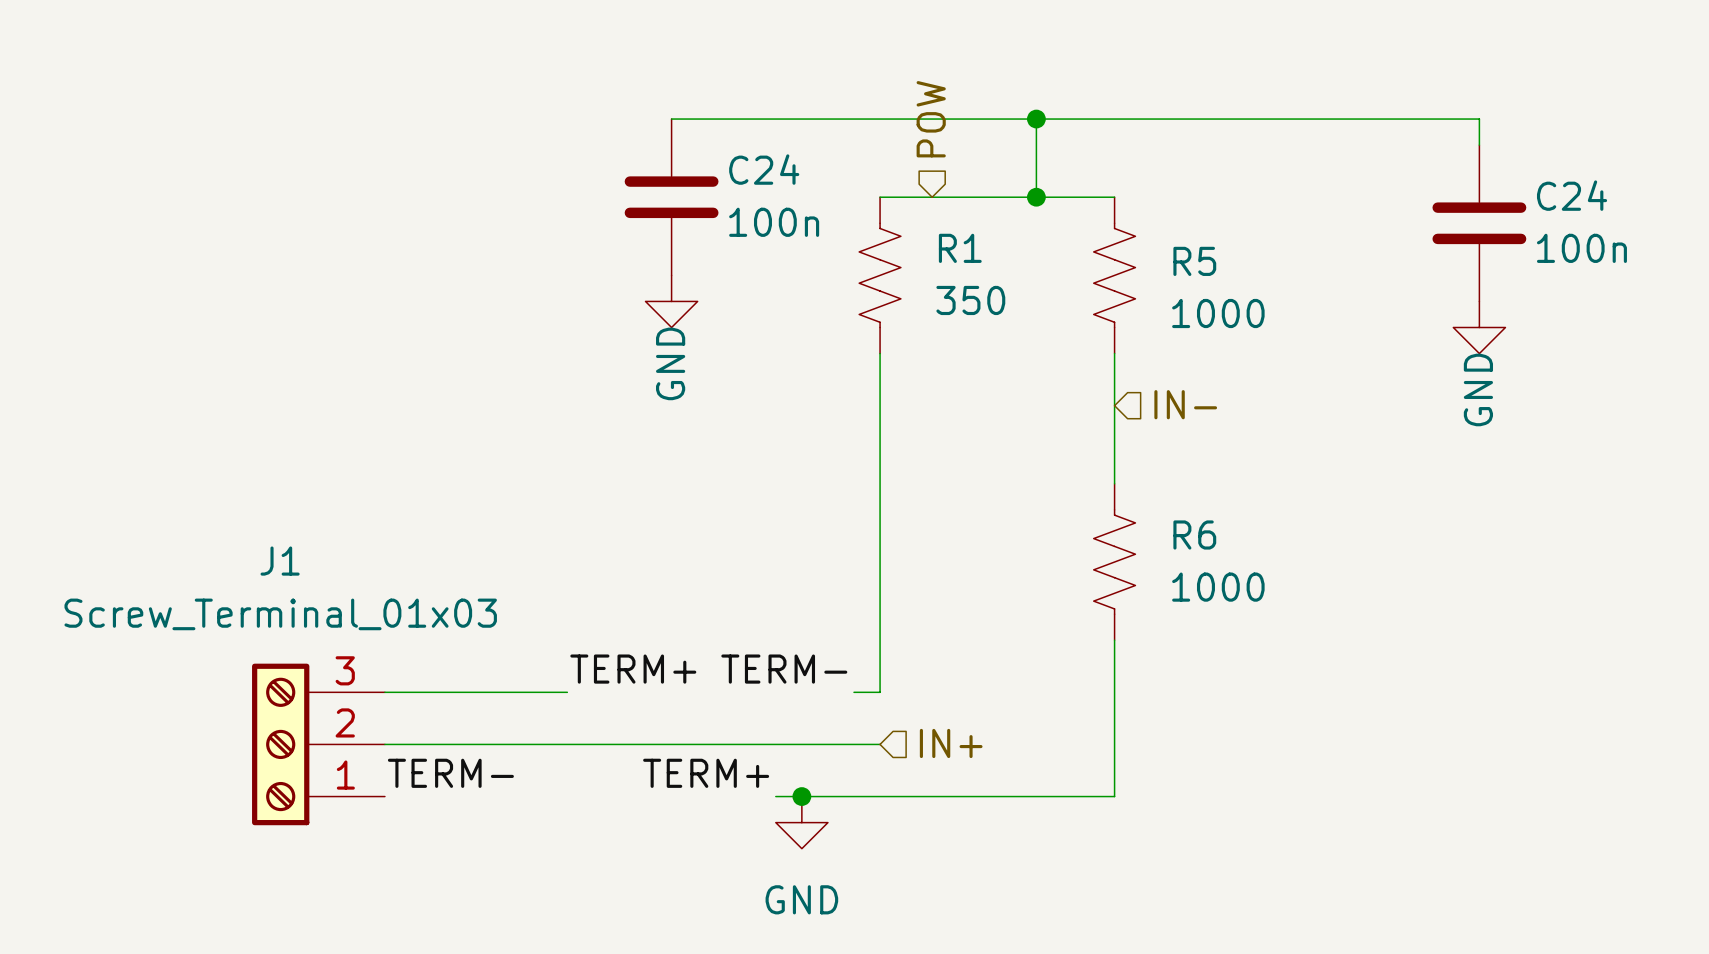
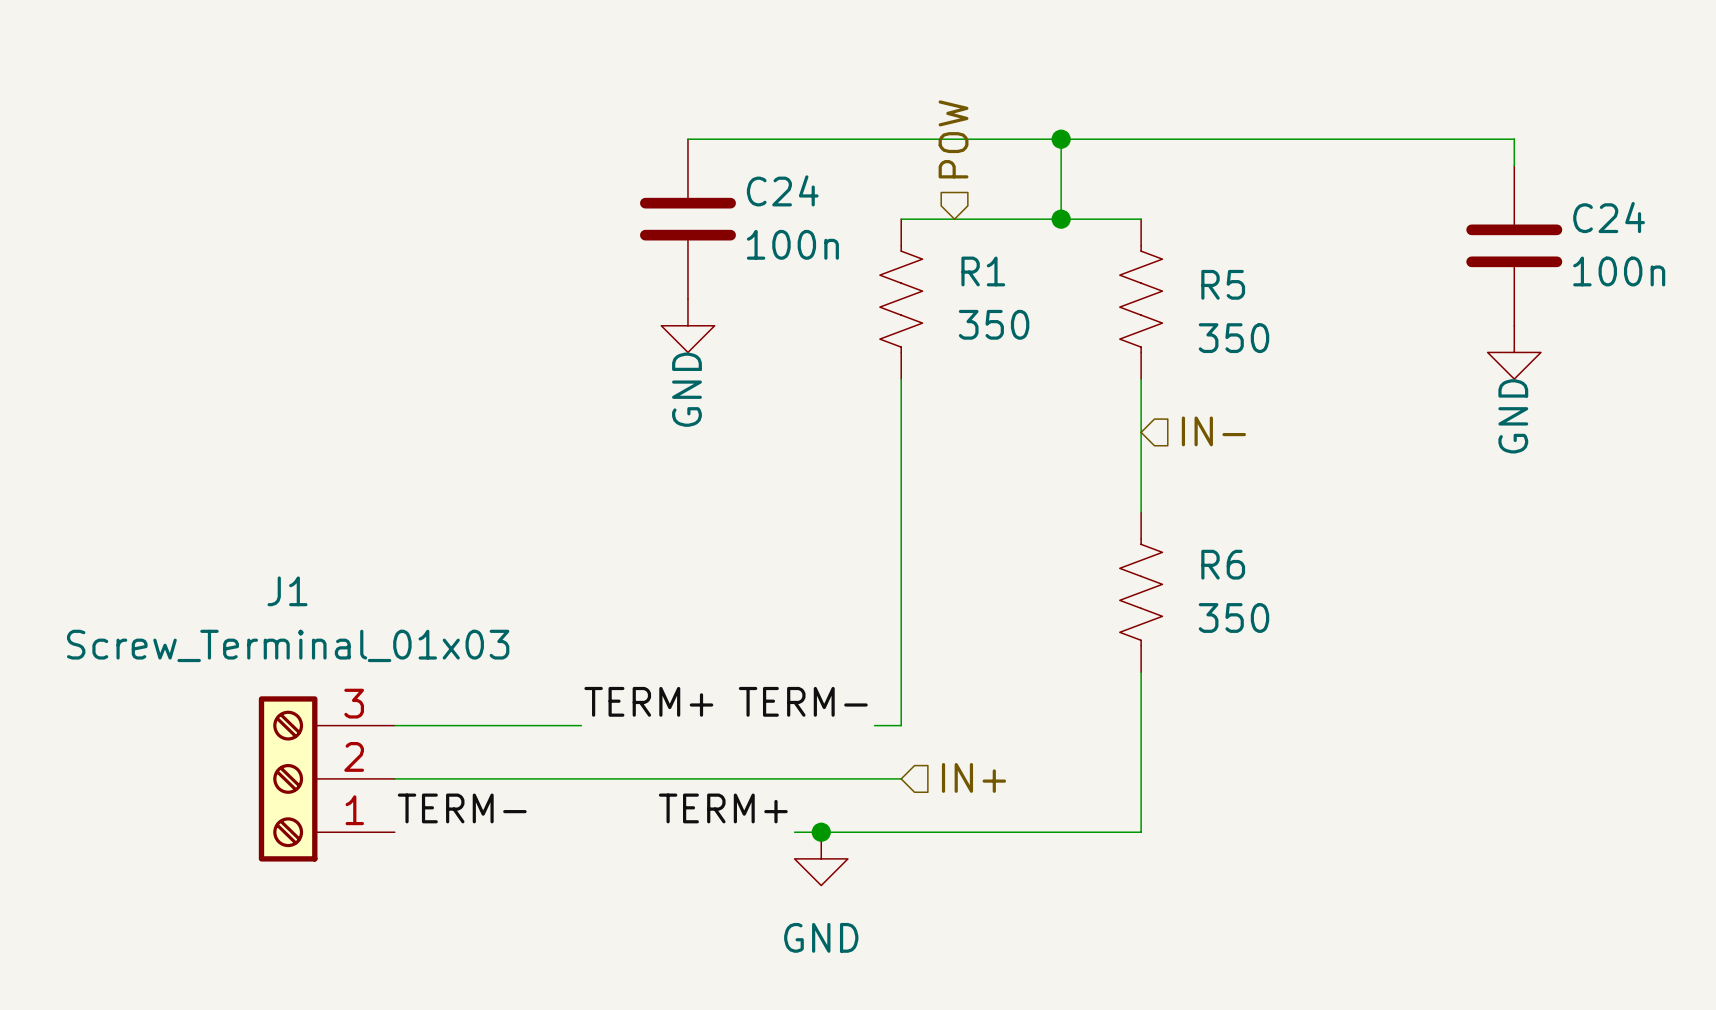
R5 value: 1000 (1218, 313) -> 350 (1233, 338)
R6 value: 1000 (1218, 587) -> 350 (1233, 617)

